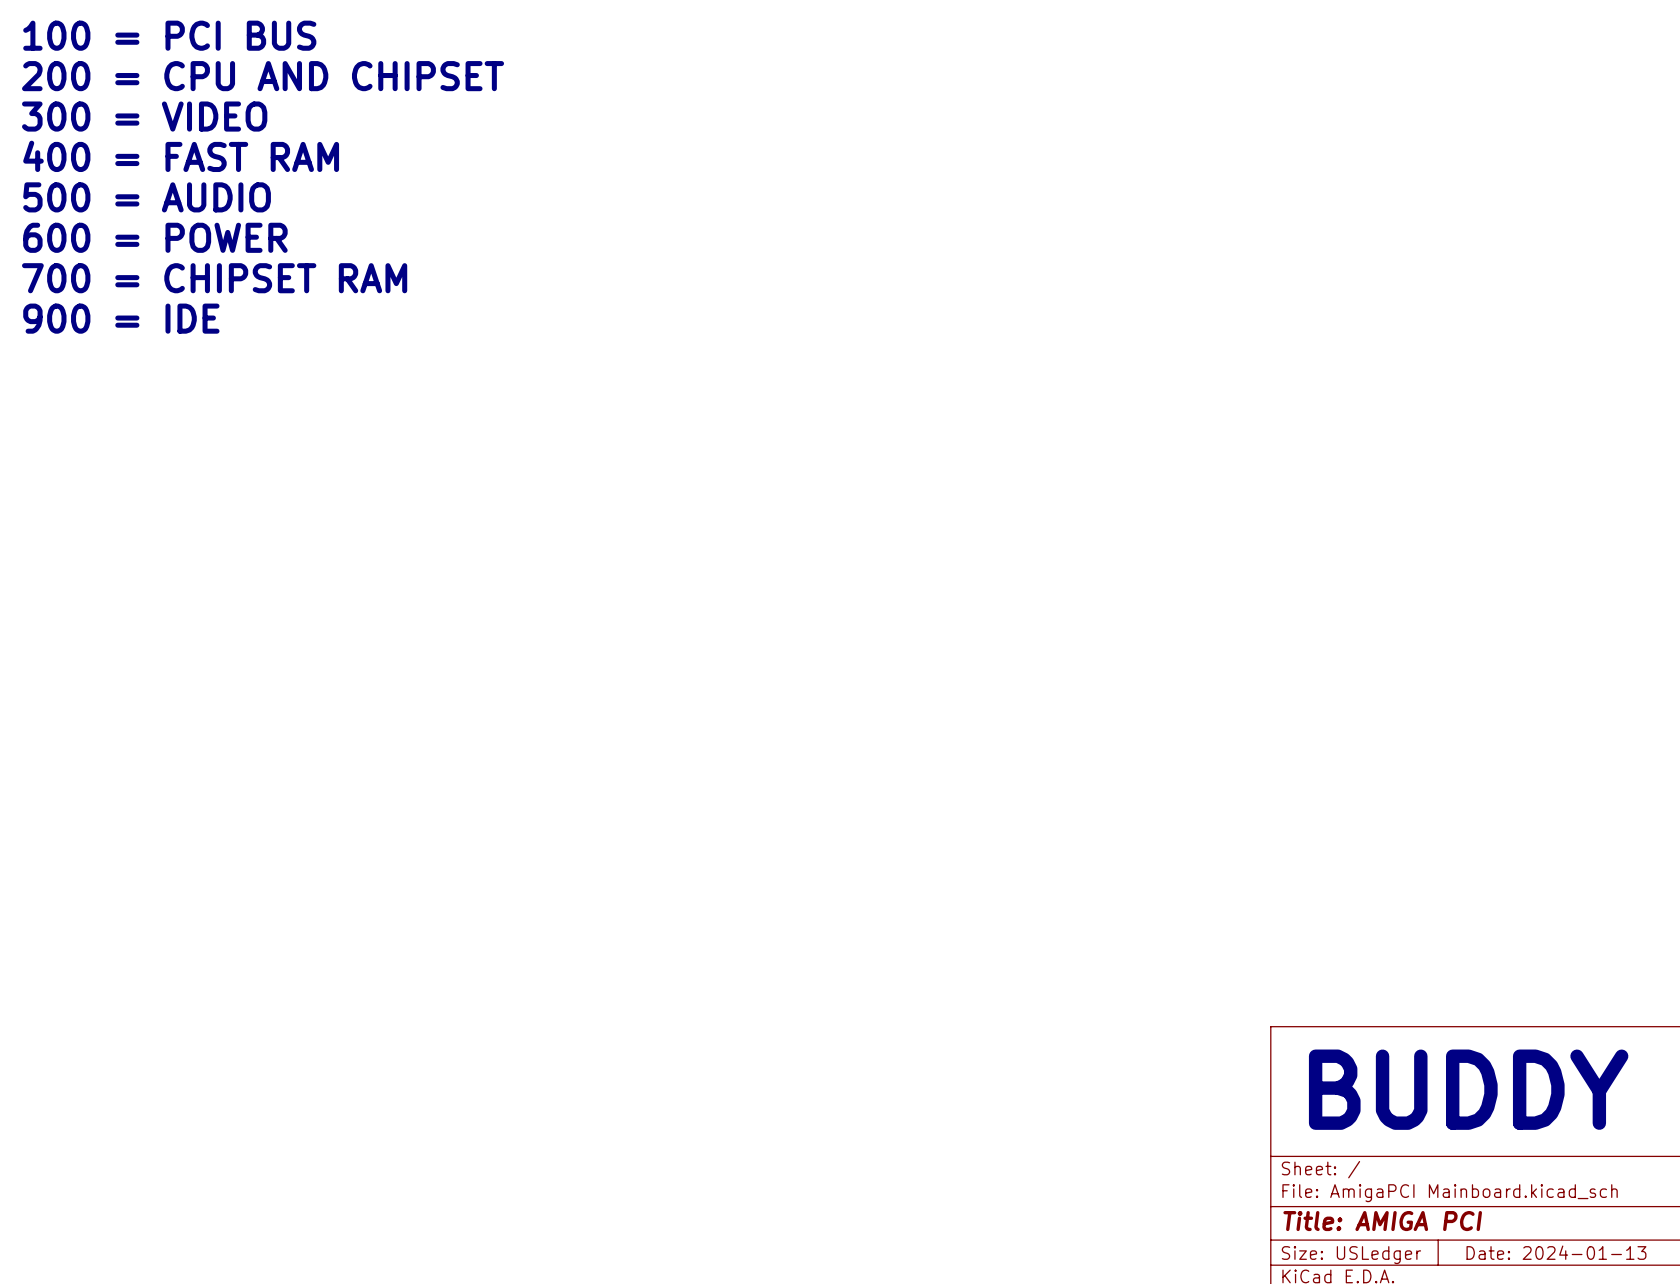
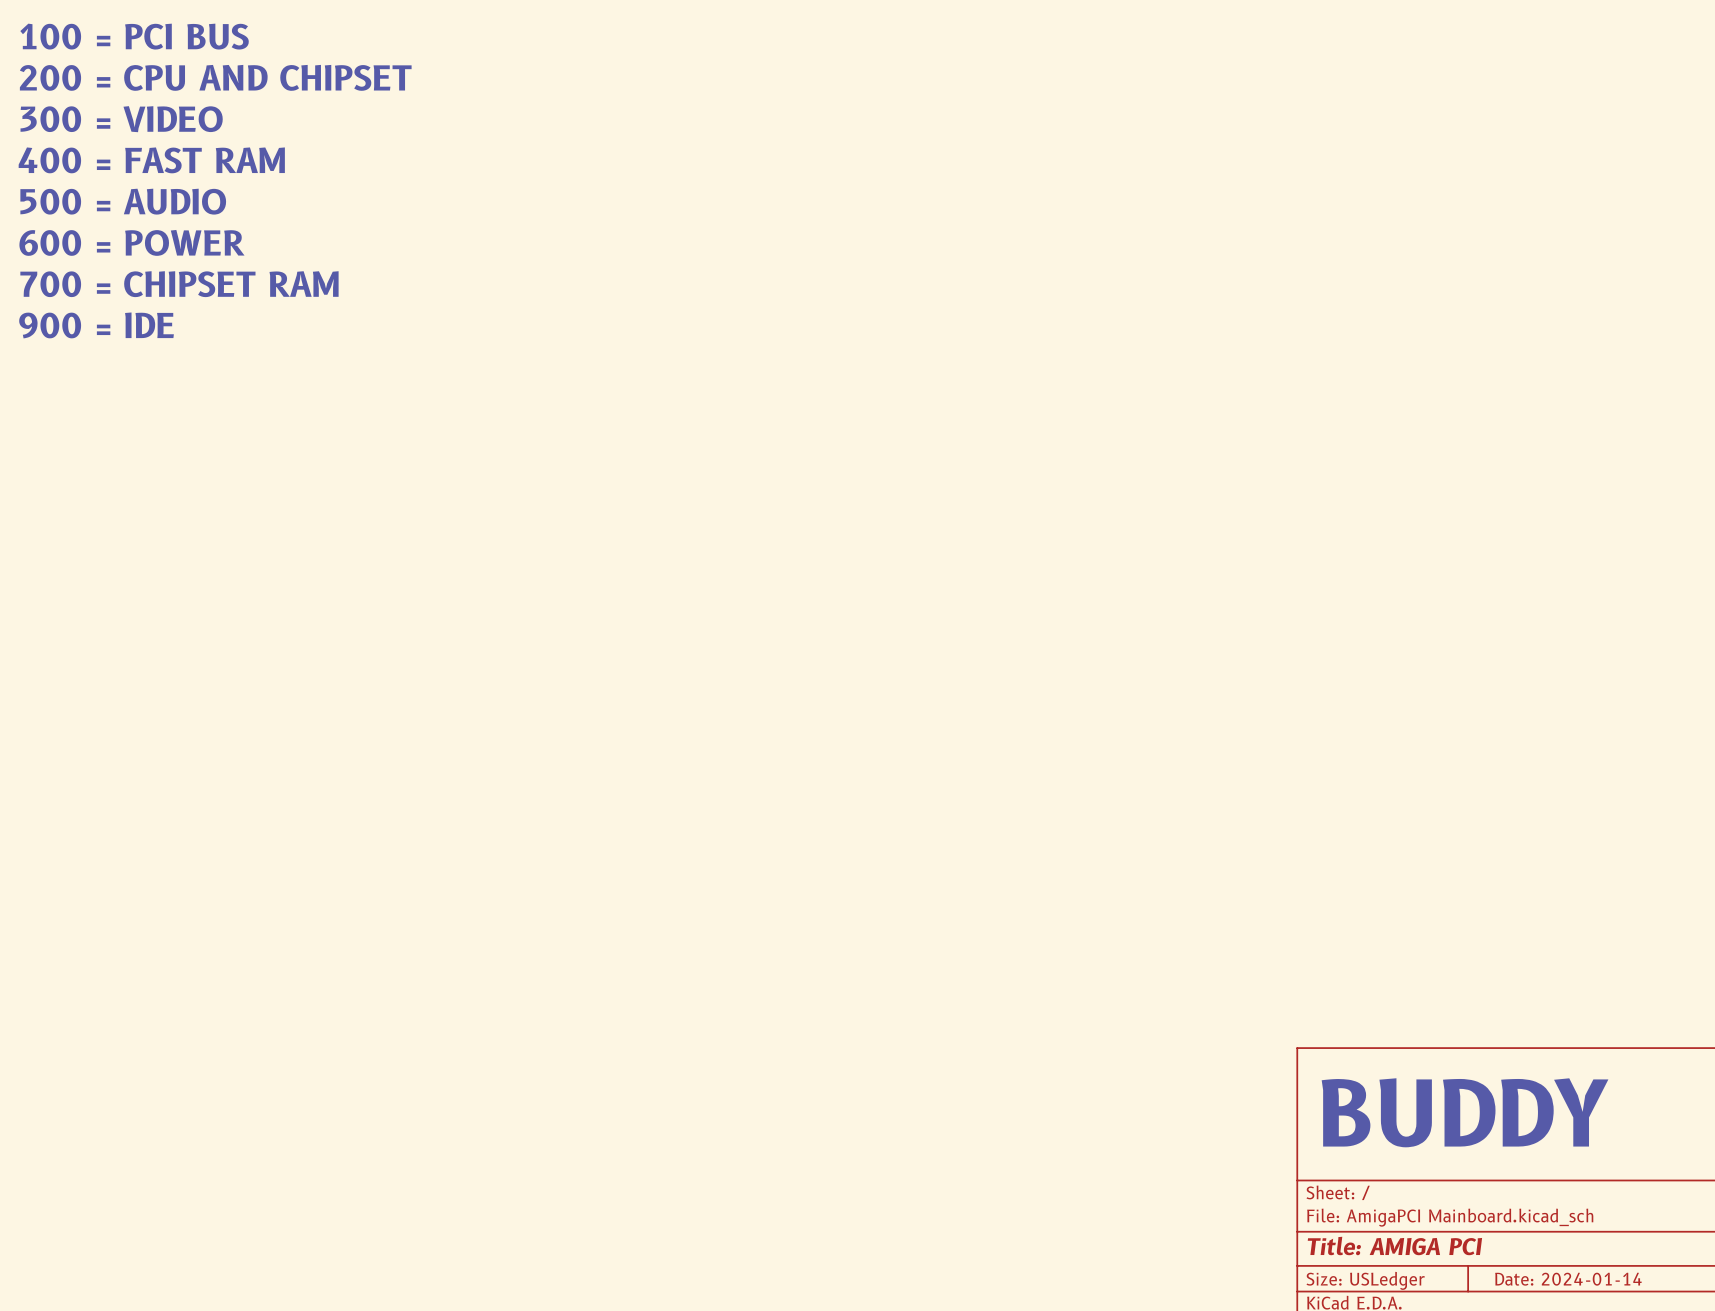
title block: Date: 2024-01-13 (1556, 1252) -> Date: 2024-01-14 (1568, 1279)

